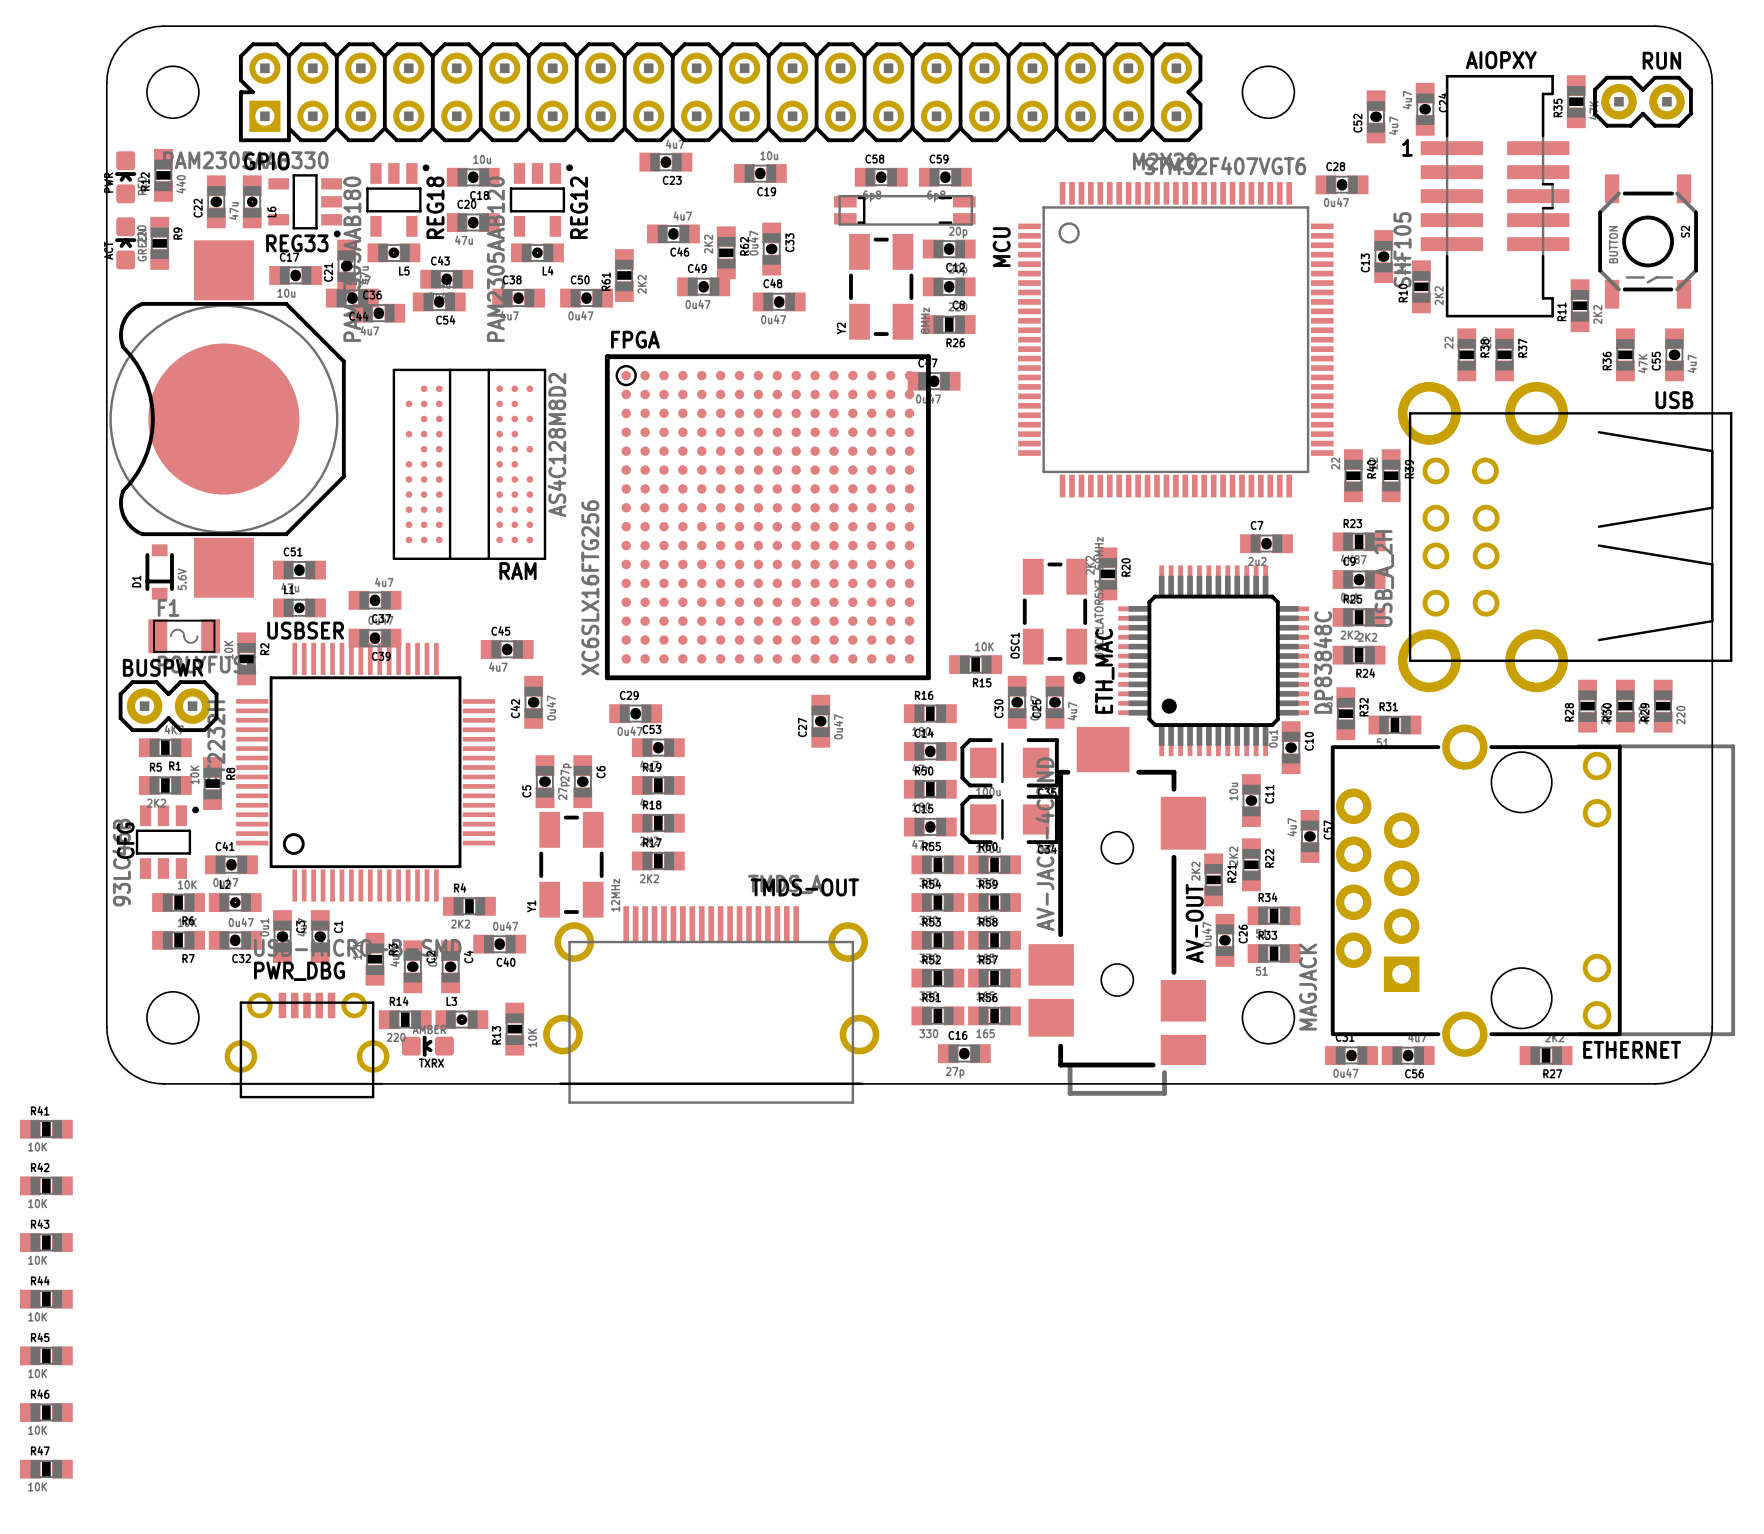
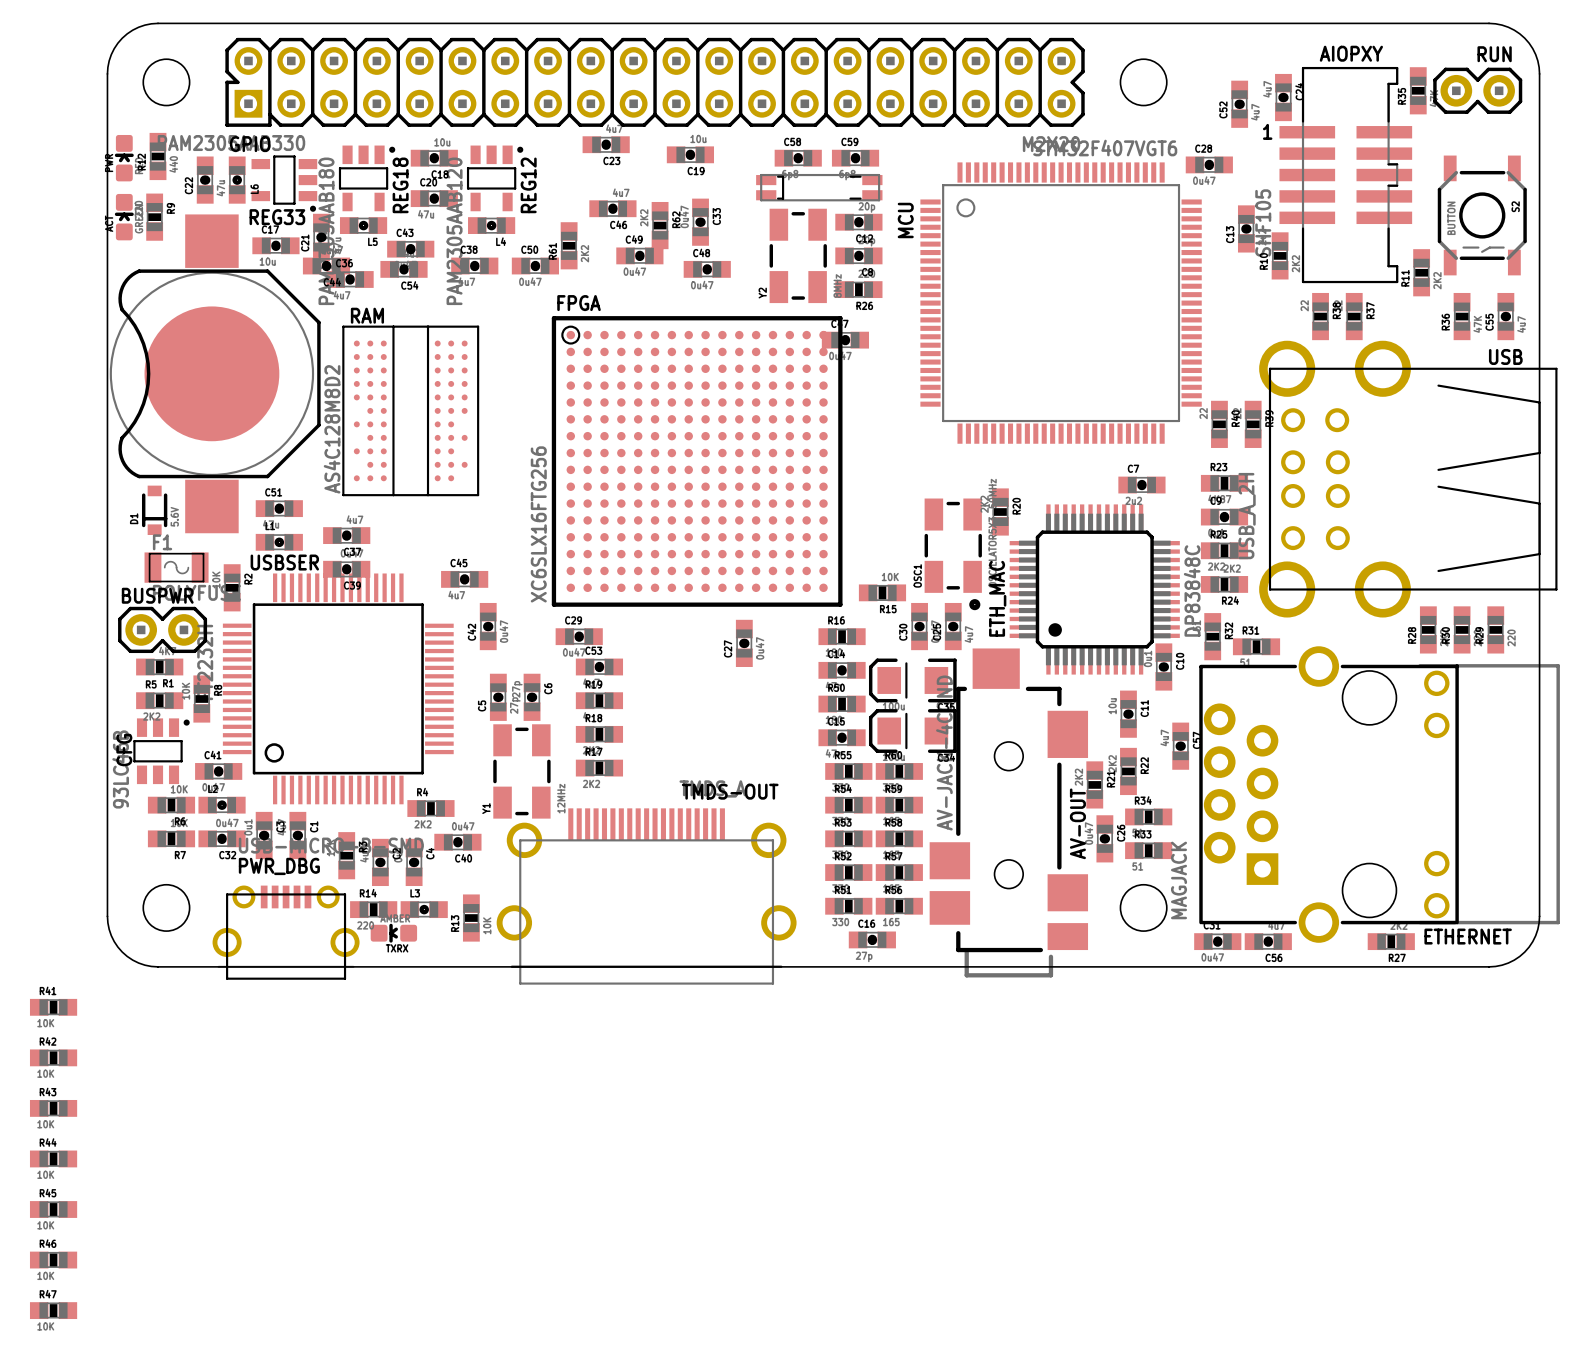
RAM rotation: 0° (469, 464) -> 180° (410, 410)

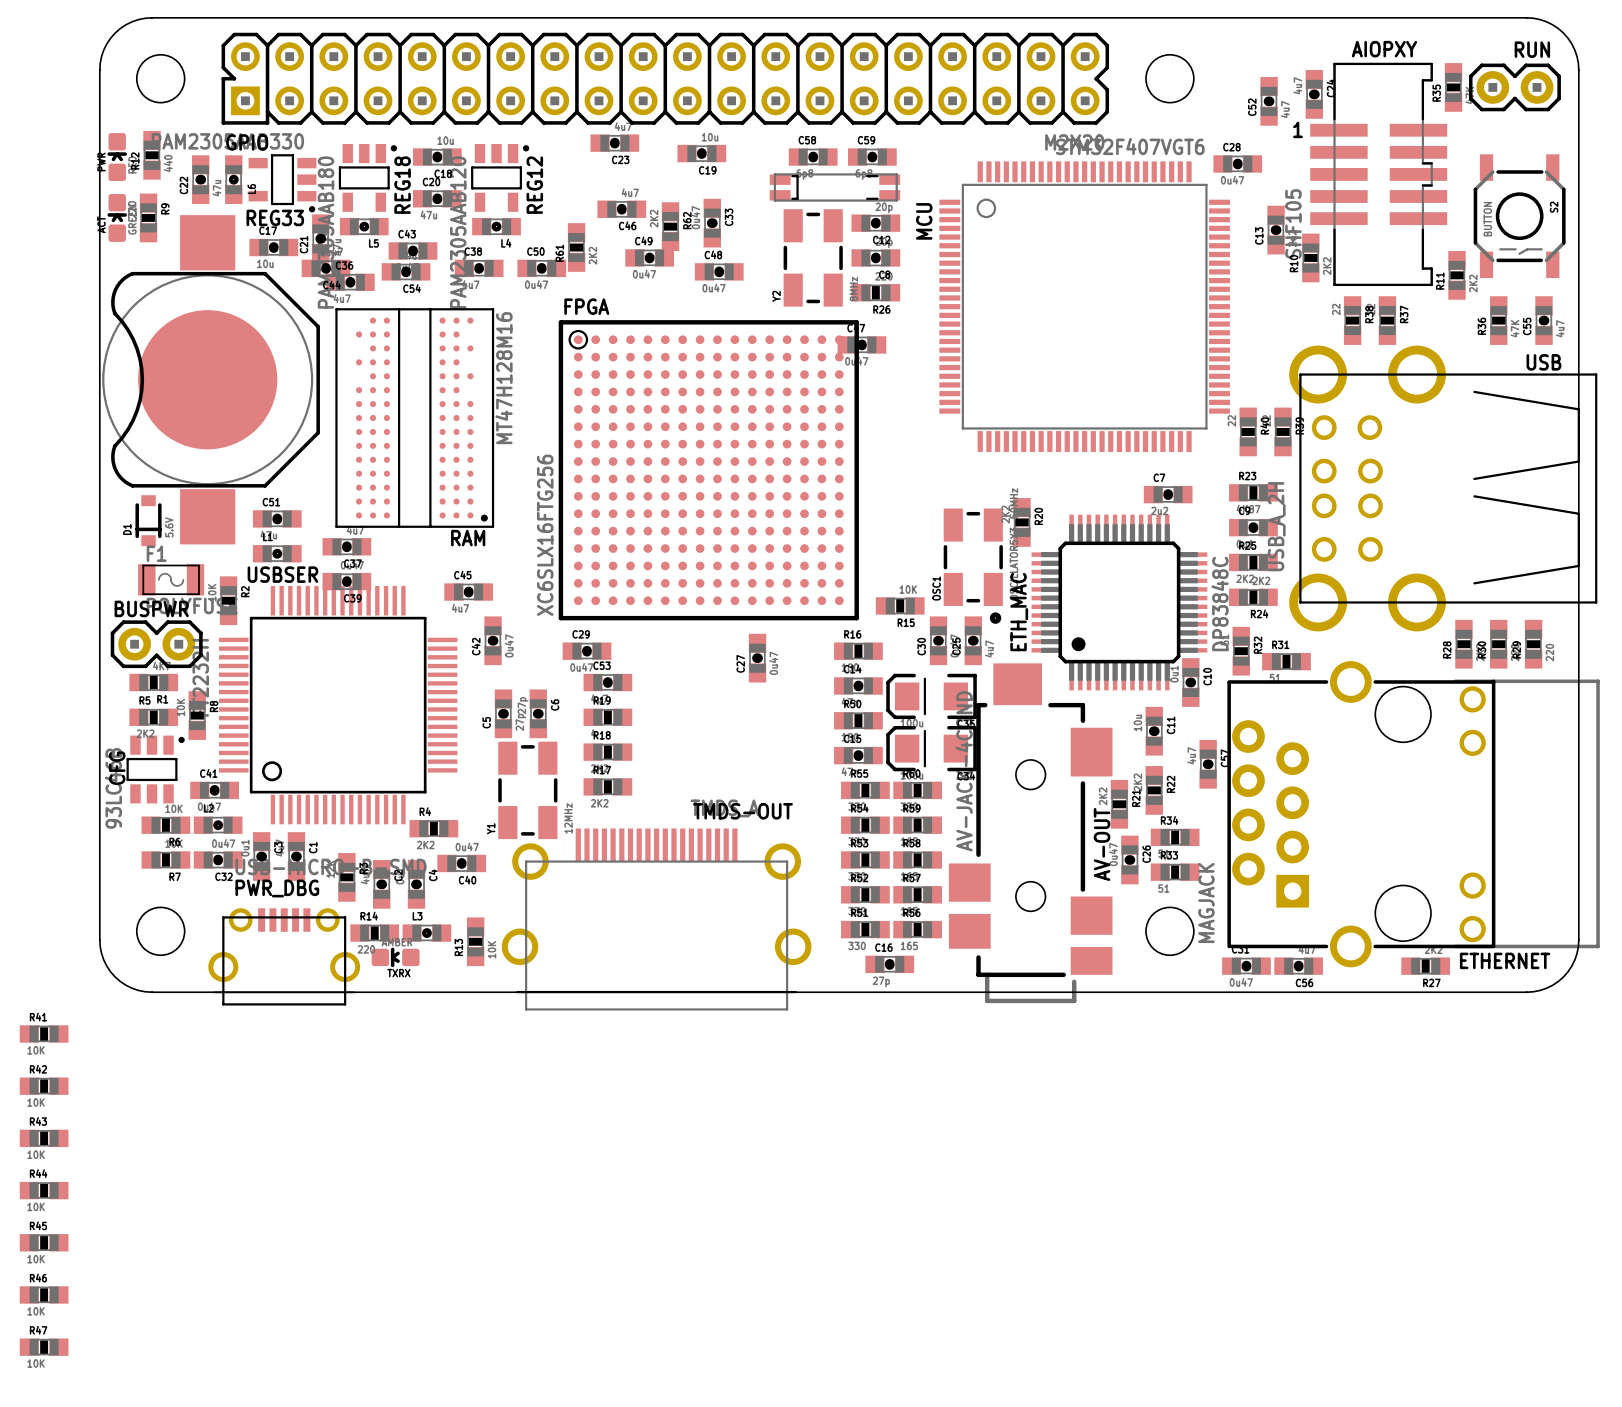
RAM name position: RAM (367, 315) -> RAM (468, 538)
RAM footprint: [342, 325, 480, 497] -> [335, 308, 495, 528]
RAM value: AS4C128M8D2 (332, 429) -> MT47H128M16 (504, 378)

